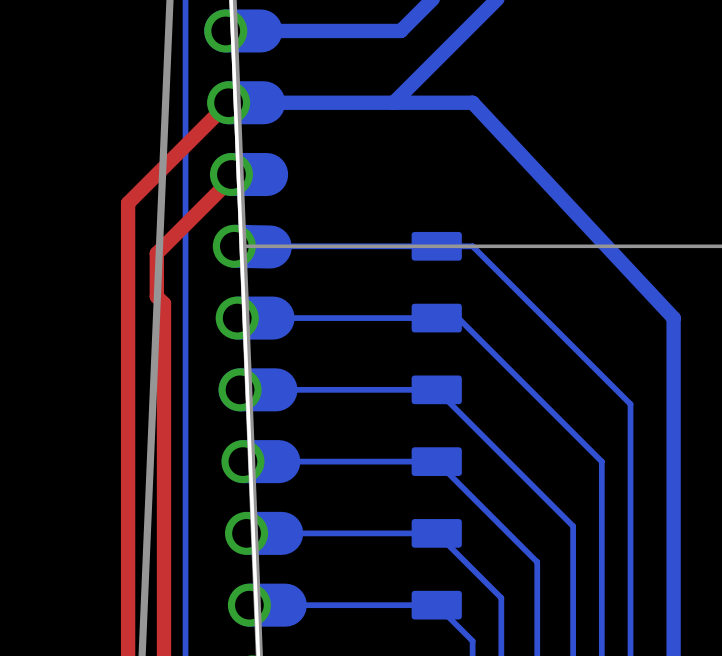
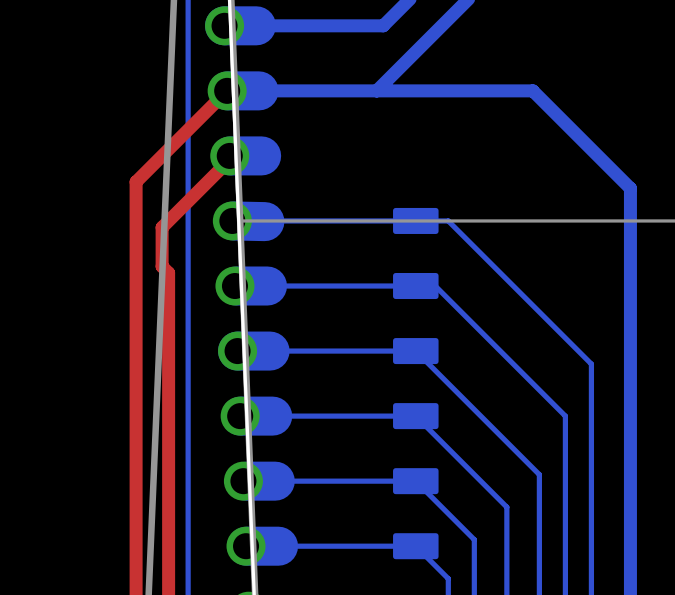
bottom track: (472, 102) (673, 318) -> (448, 90) (532, 90) (630, 188) (630, 286)

